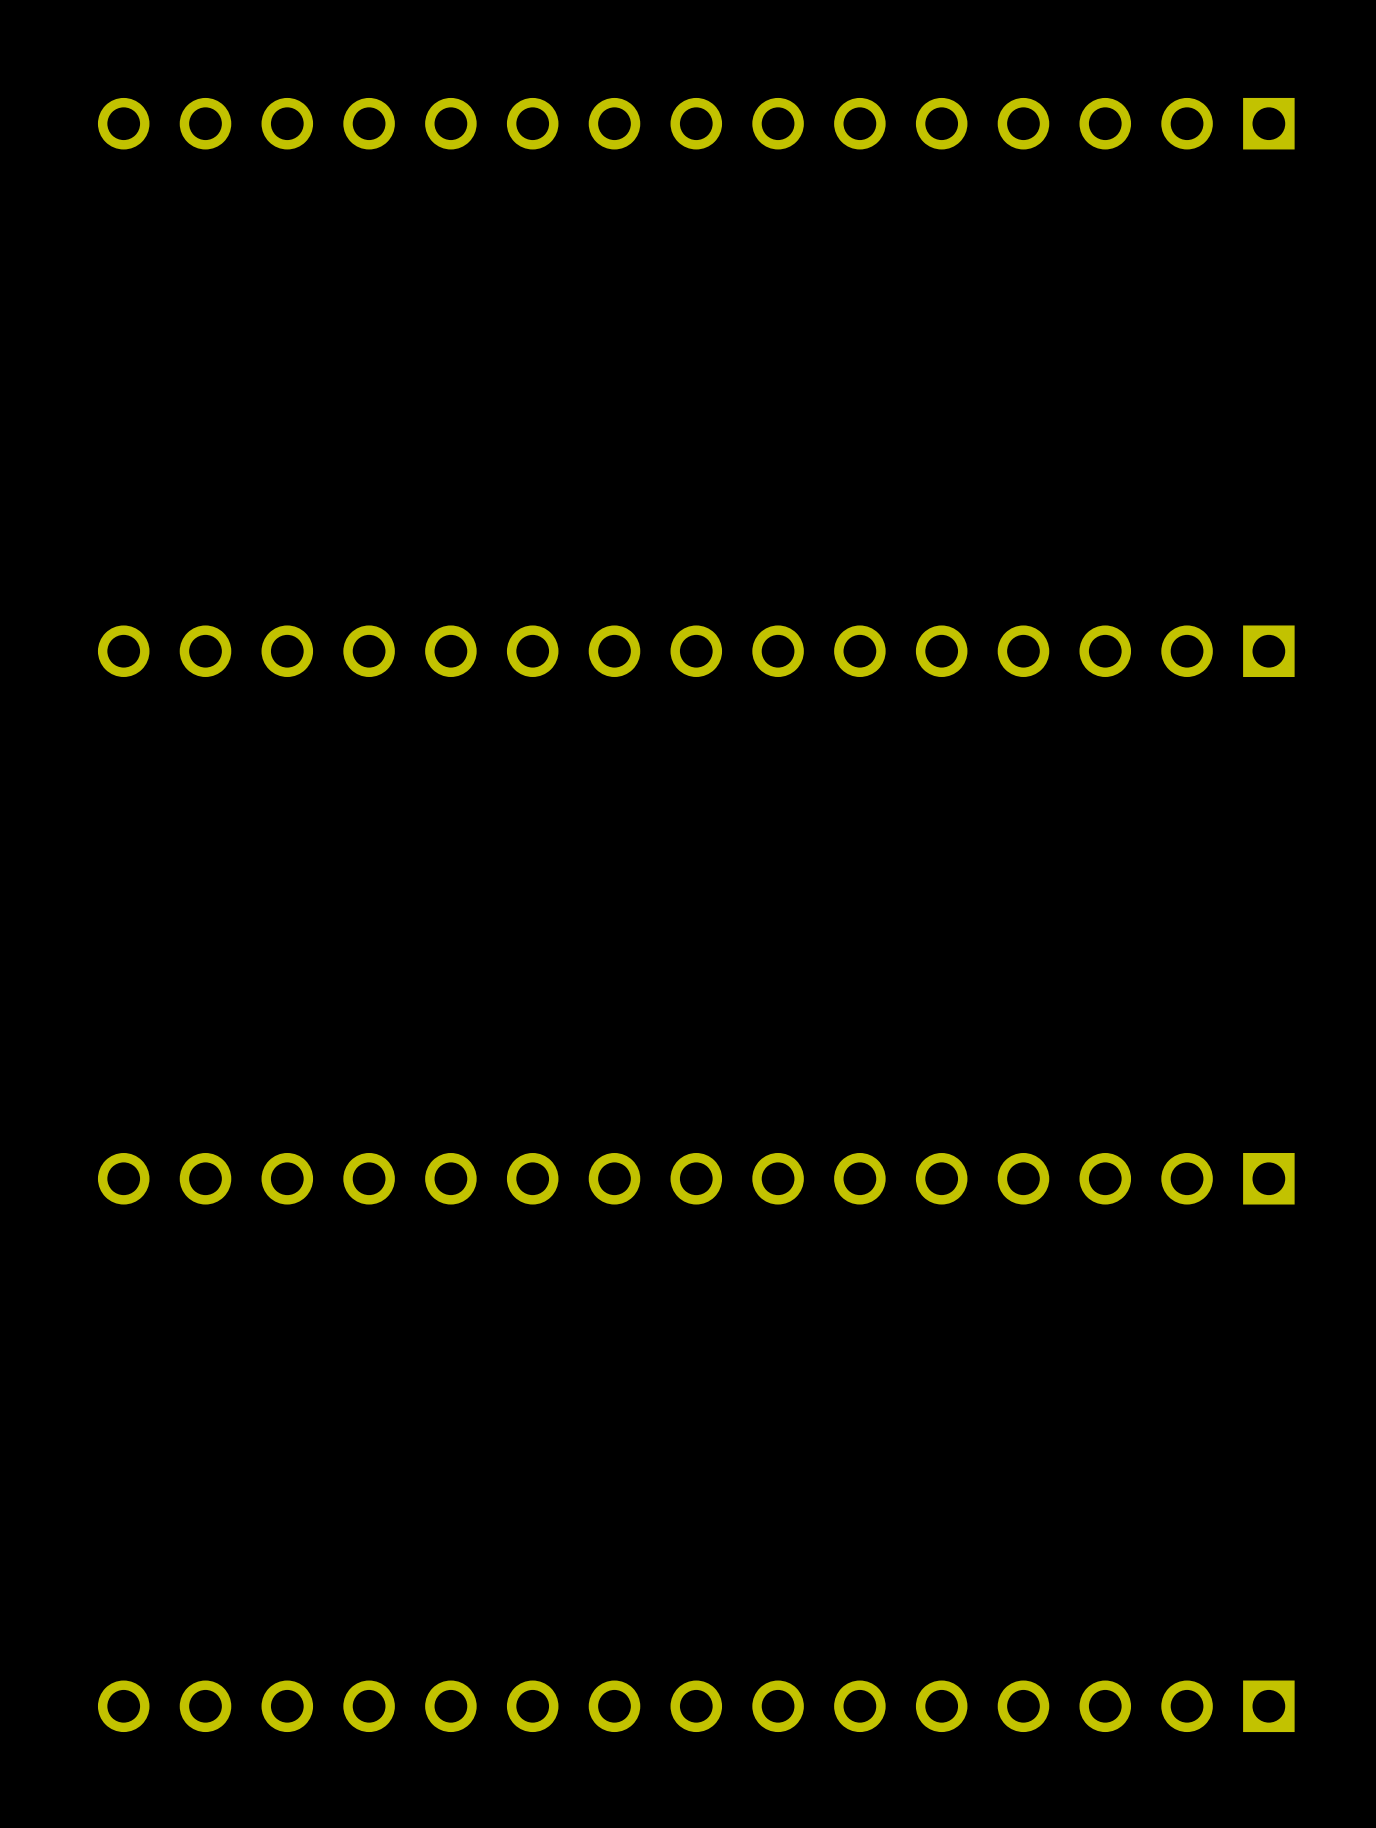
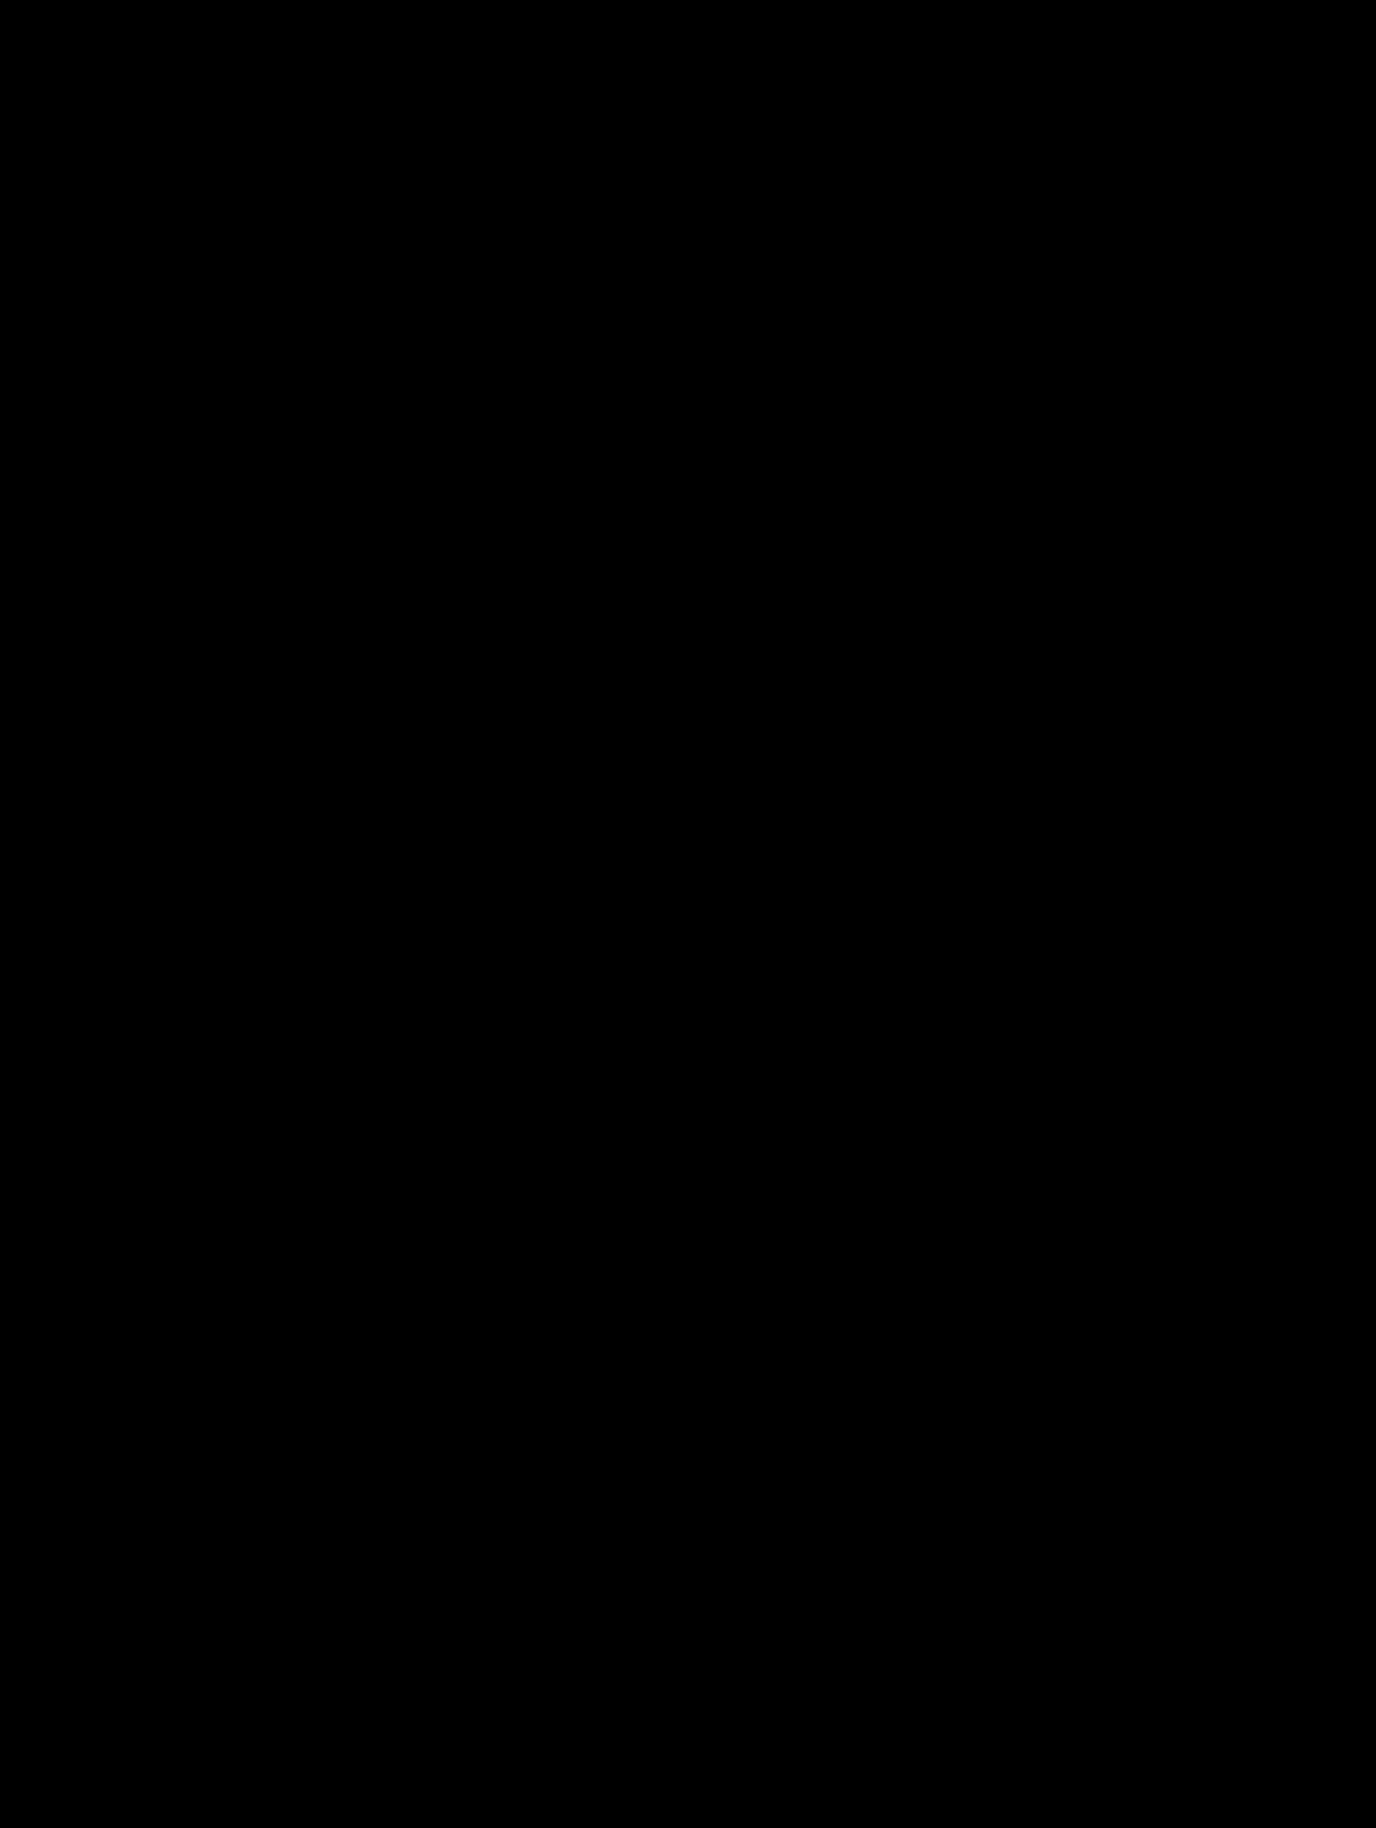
part: (696, 123) -> none
part: (696, 651) -> none
part: (696, 1178) -> none
part: (696, 1706) -> none

